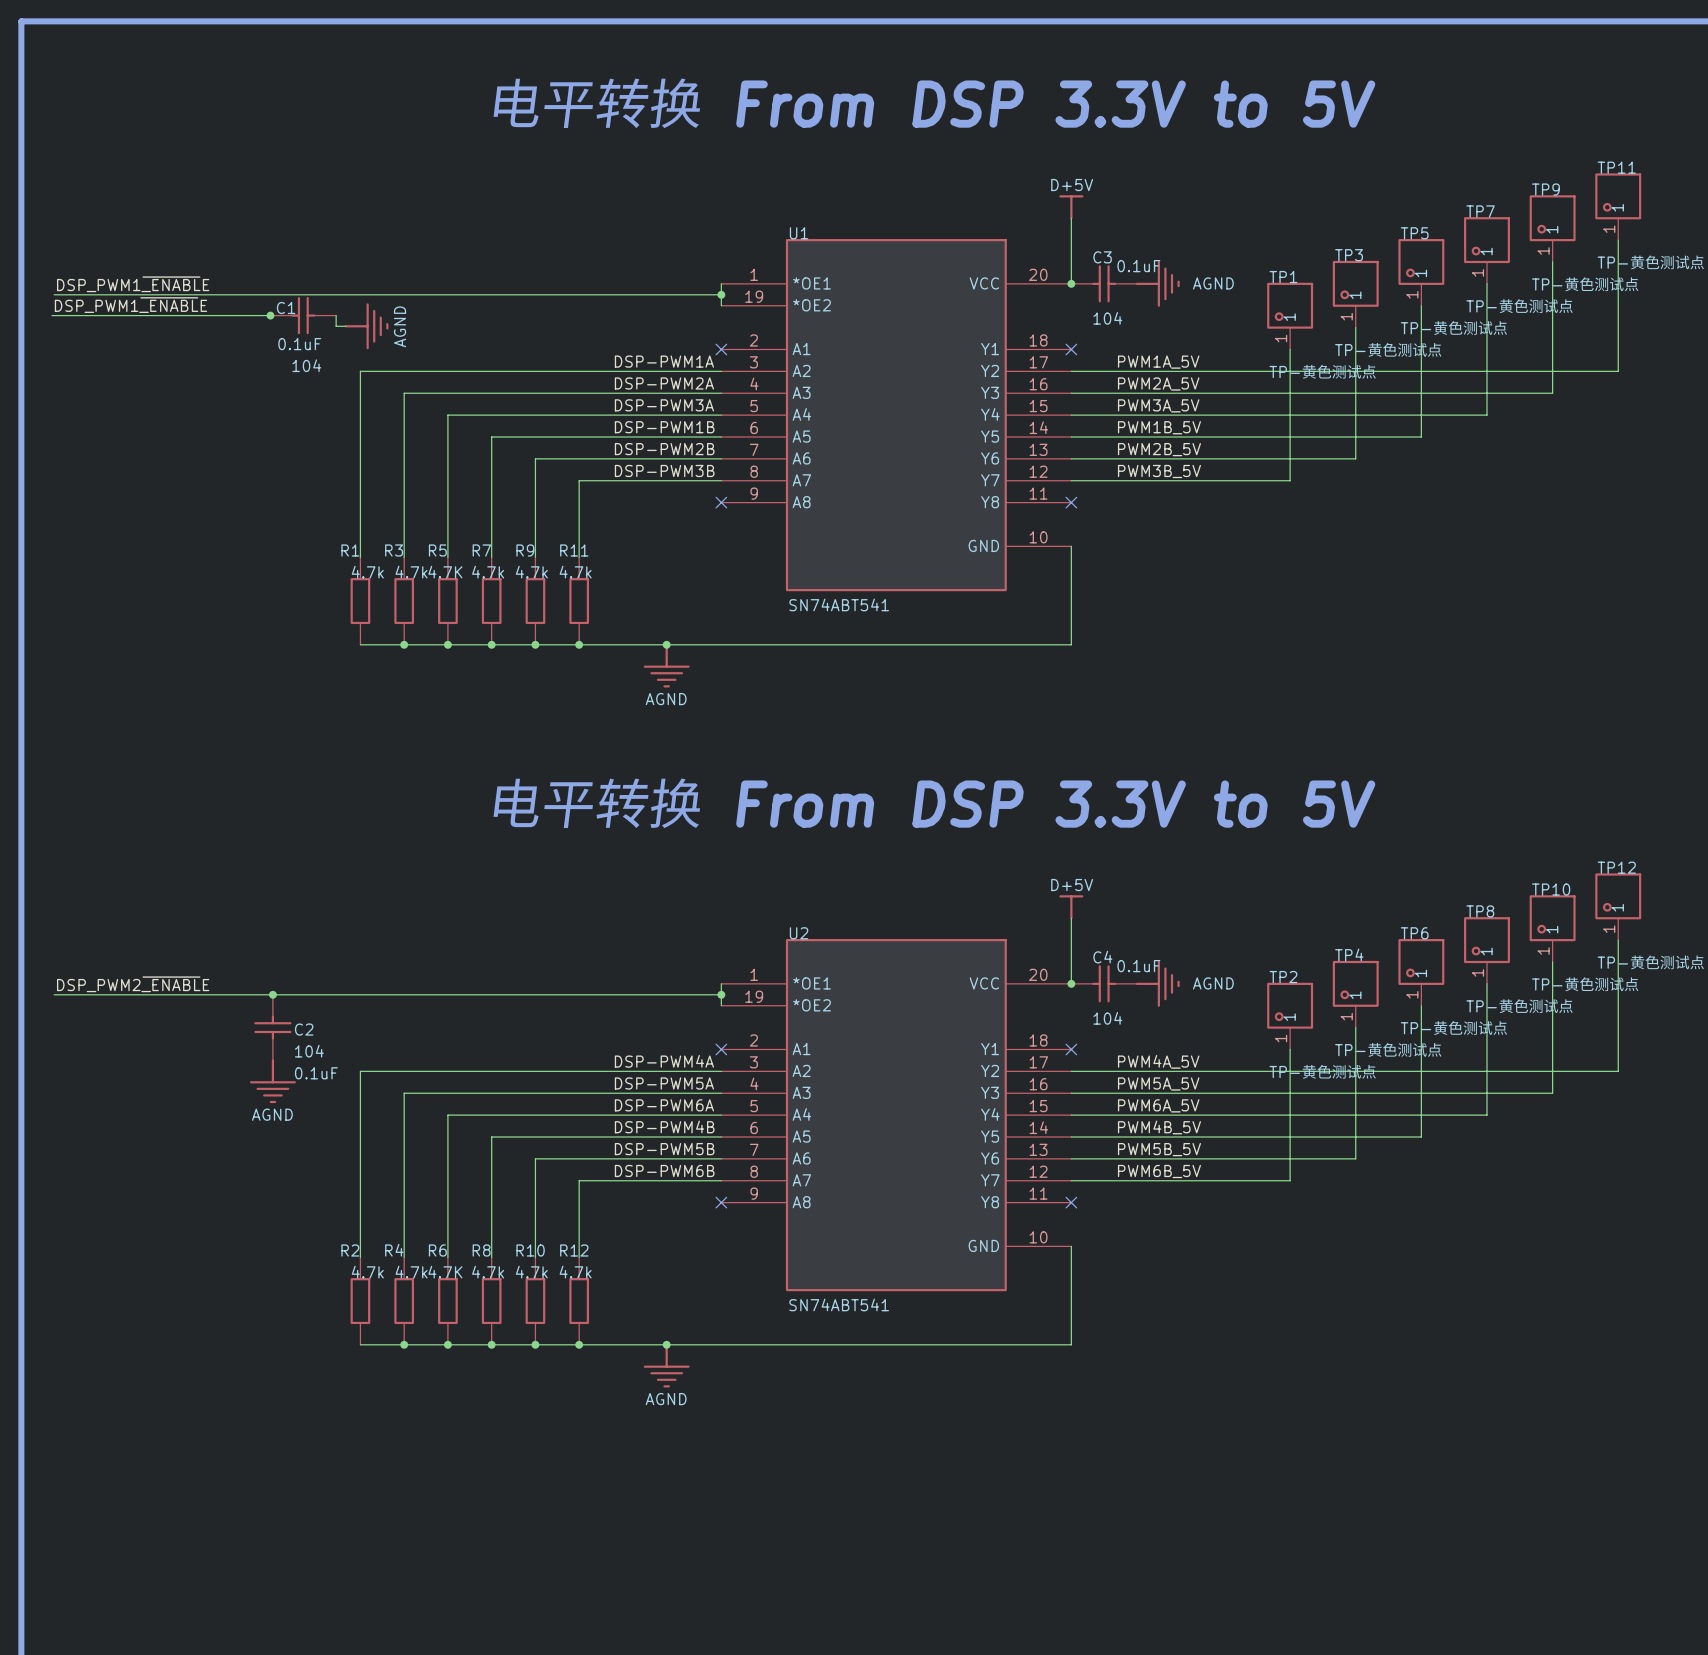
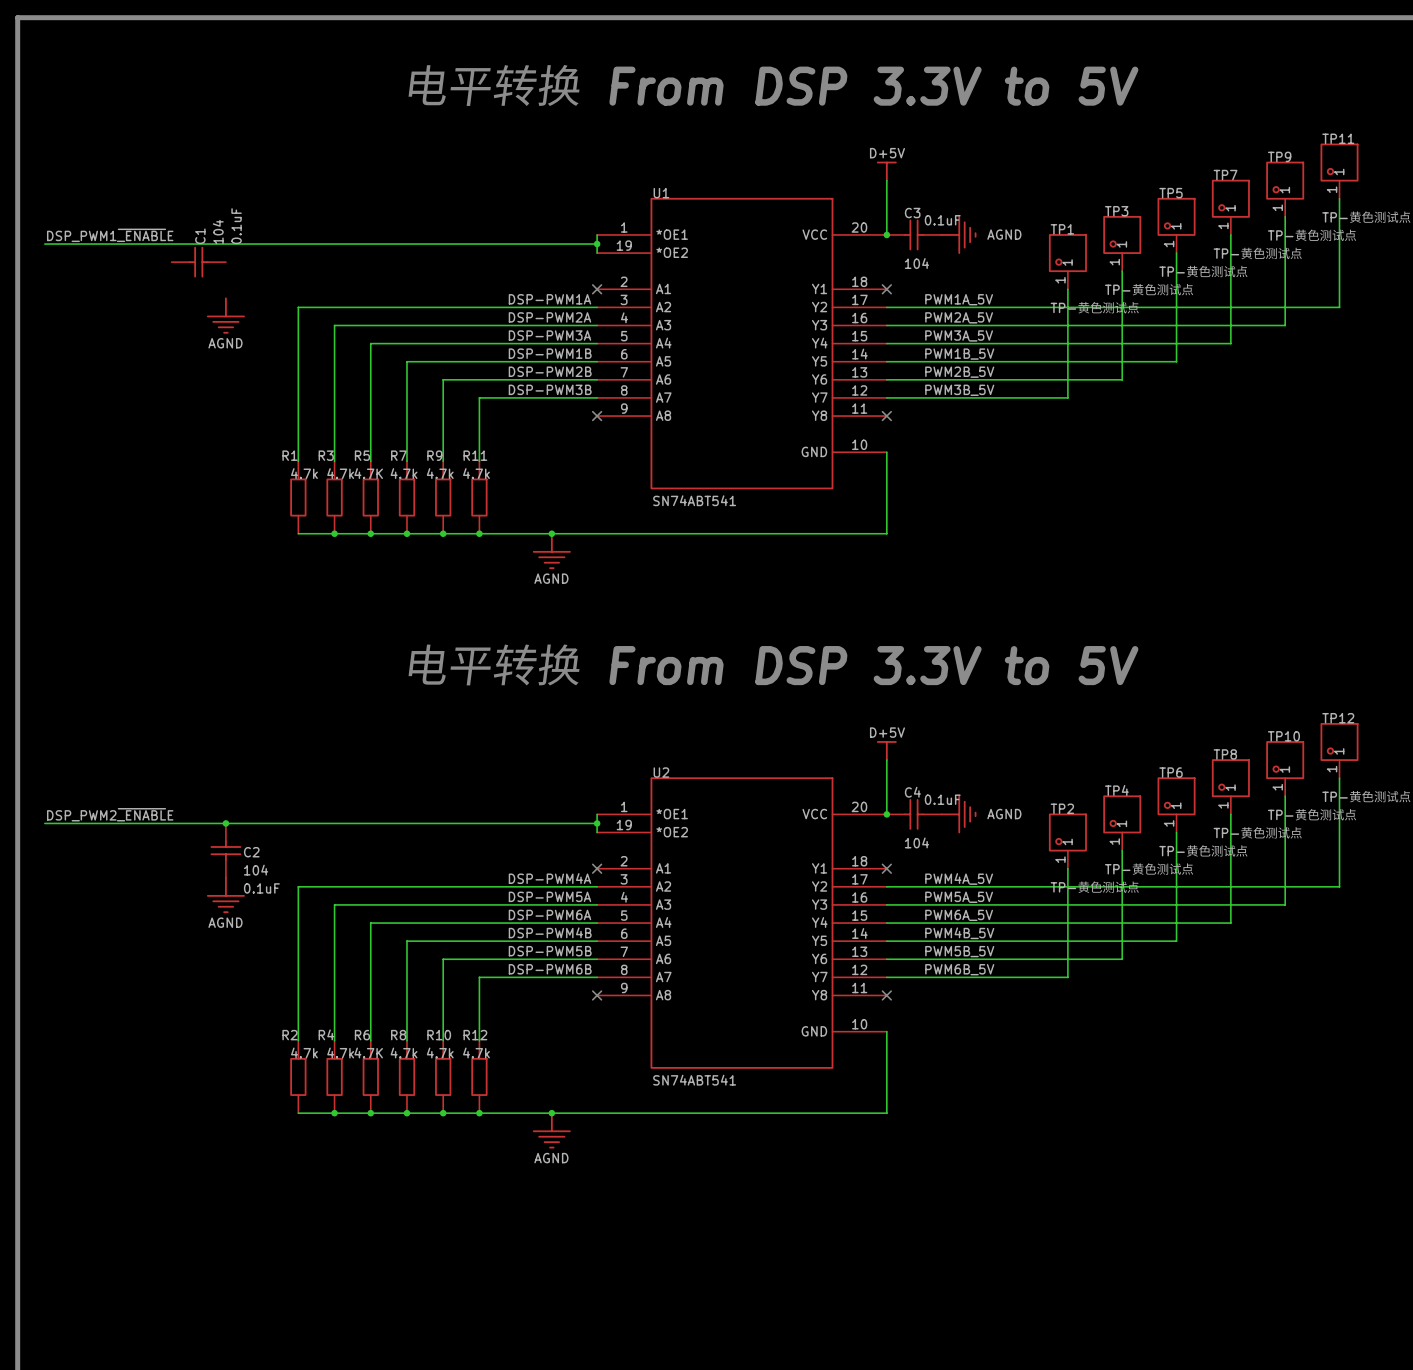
label: DSP_PWM1~{_ENABL}E (130, 305) -> none
C1 name rotation: 0° (286, 308) -> 90° counterclockwise (200, 236)
C1 name position: C1 (286, 308) -> C1 (200, 236)
wire: (51, 315) (270, 315) -> none
junction: (270, 315) -> none
C1 position: (303, 315) -> (198, 262)
wire: (336, 315) (336, 326) (345, 326) -> none
power symbol rotation: 0° (366, 326) -> 90° clockwise (225, 315)
power symbol position: AGND (366, 326) -> AGND (225, 315)
C1 text rotation: 0° (299, 344) -> 90° counterclockwise (236, 226)
C1 text position: 0.1uF (299, 344) -> 0.1uF (236, 226)
C1 value rotation: 0° (306, 365) -> 90° counterclockwise (218, 231)
C1 value position: 104 (306, 365) -> 104 (218, 231)

